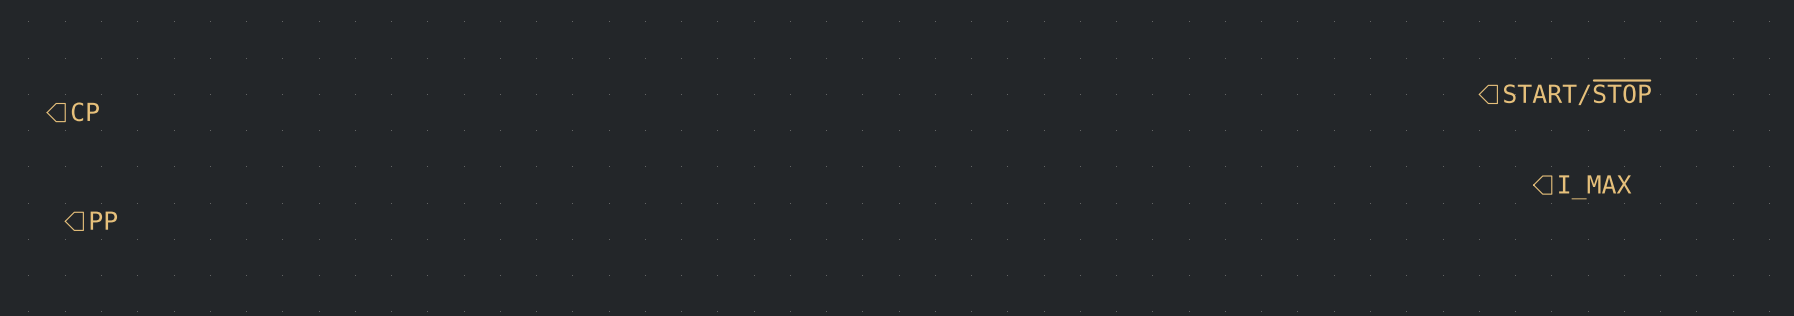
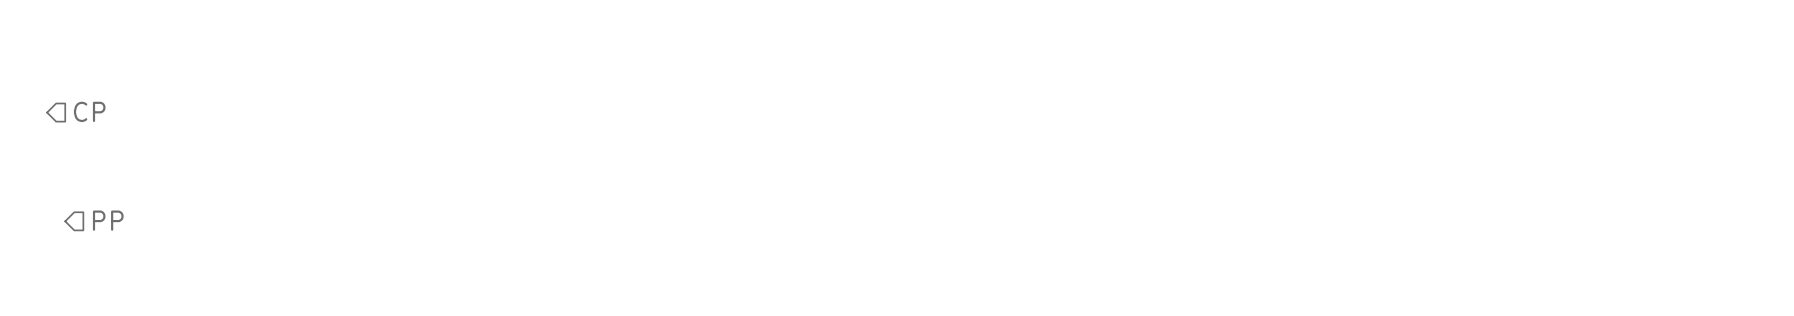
hierarchical label: START/~{STOP} (1577, 92) -> none
hierarchical label: I_MAX (1595, 187) -> none

